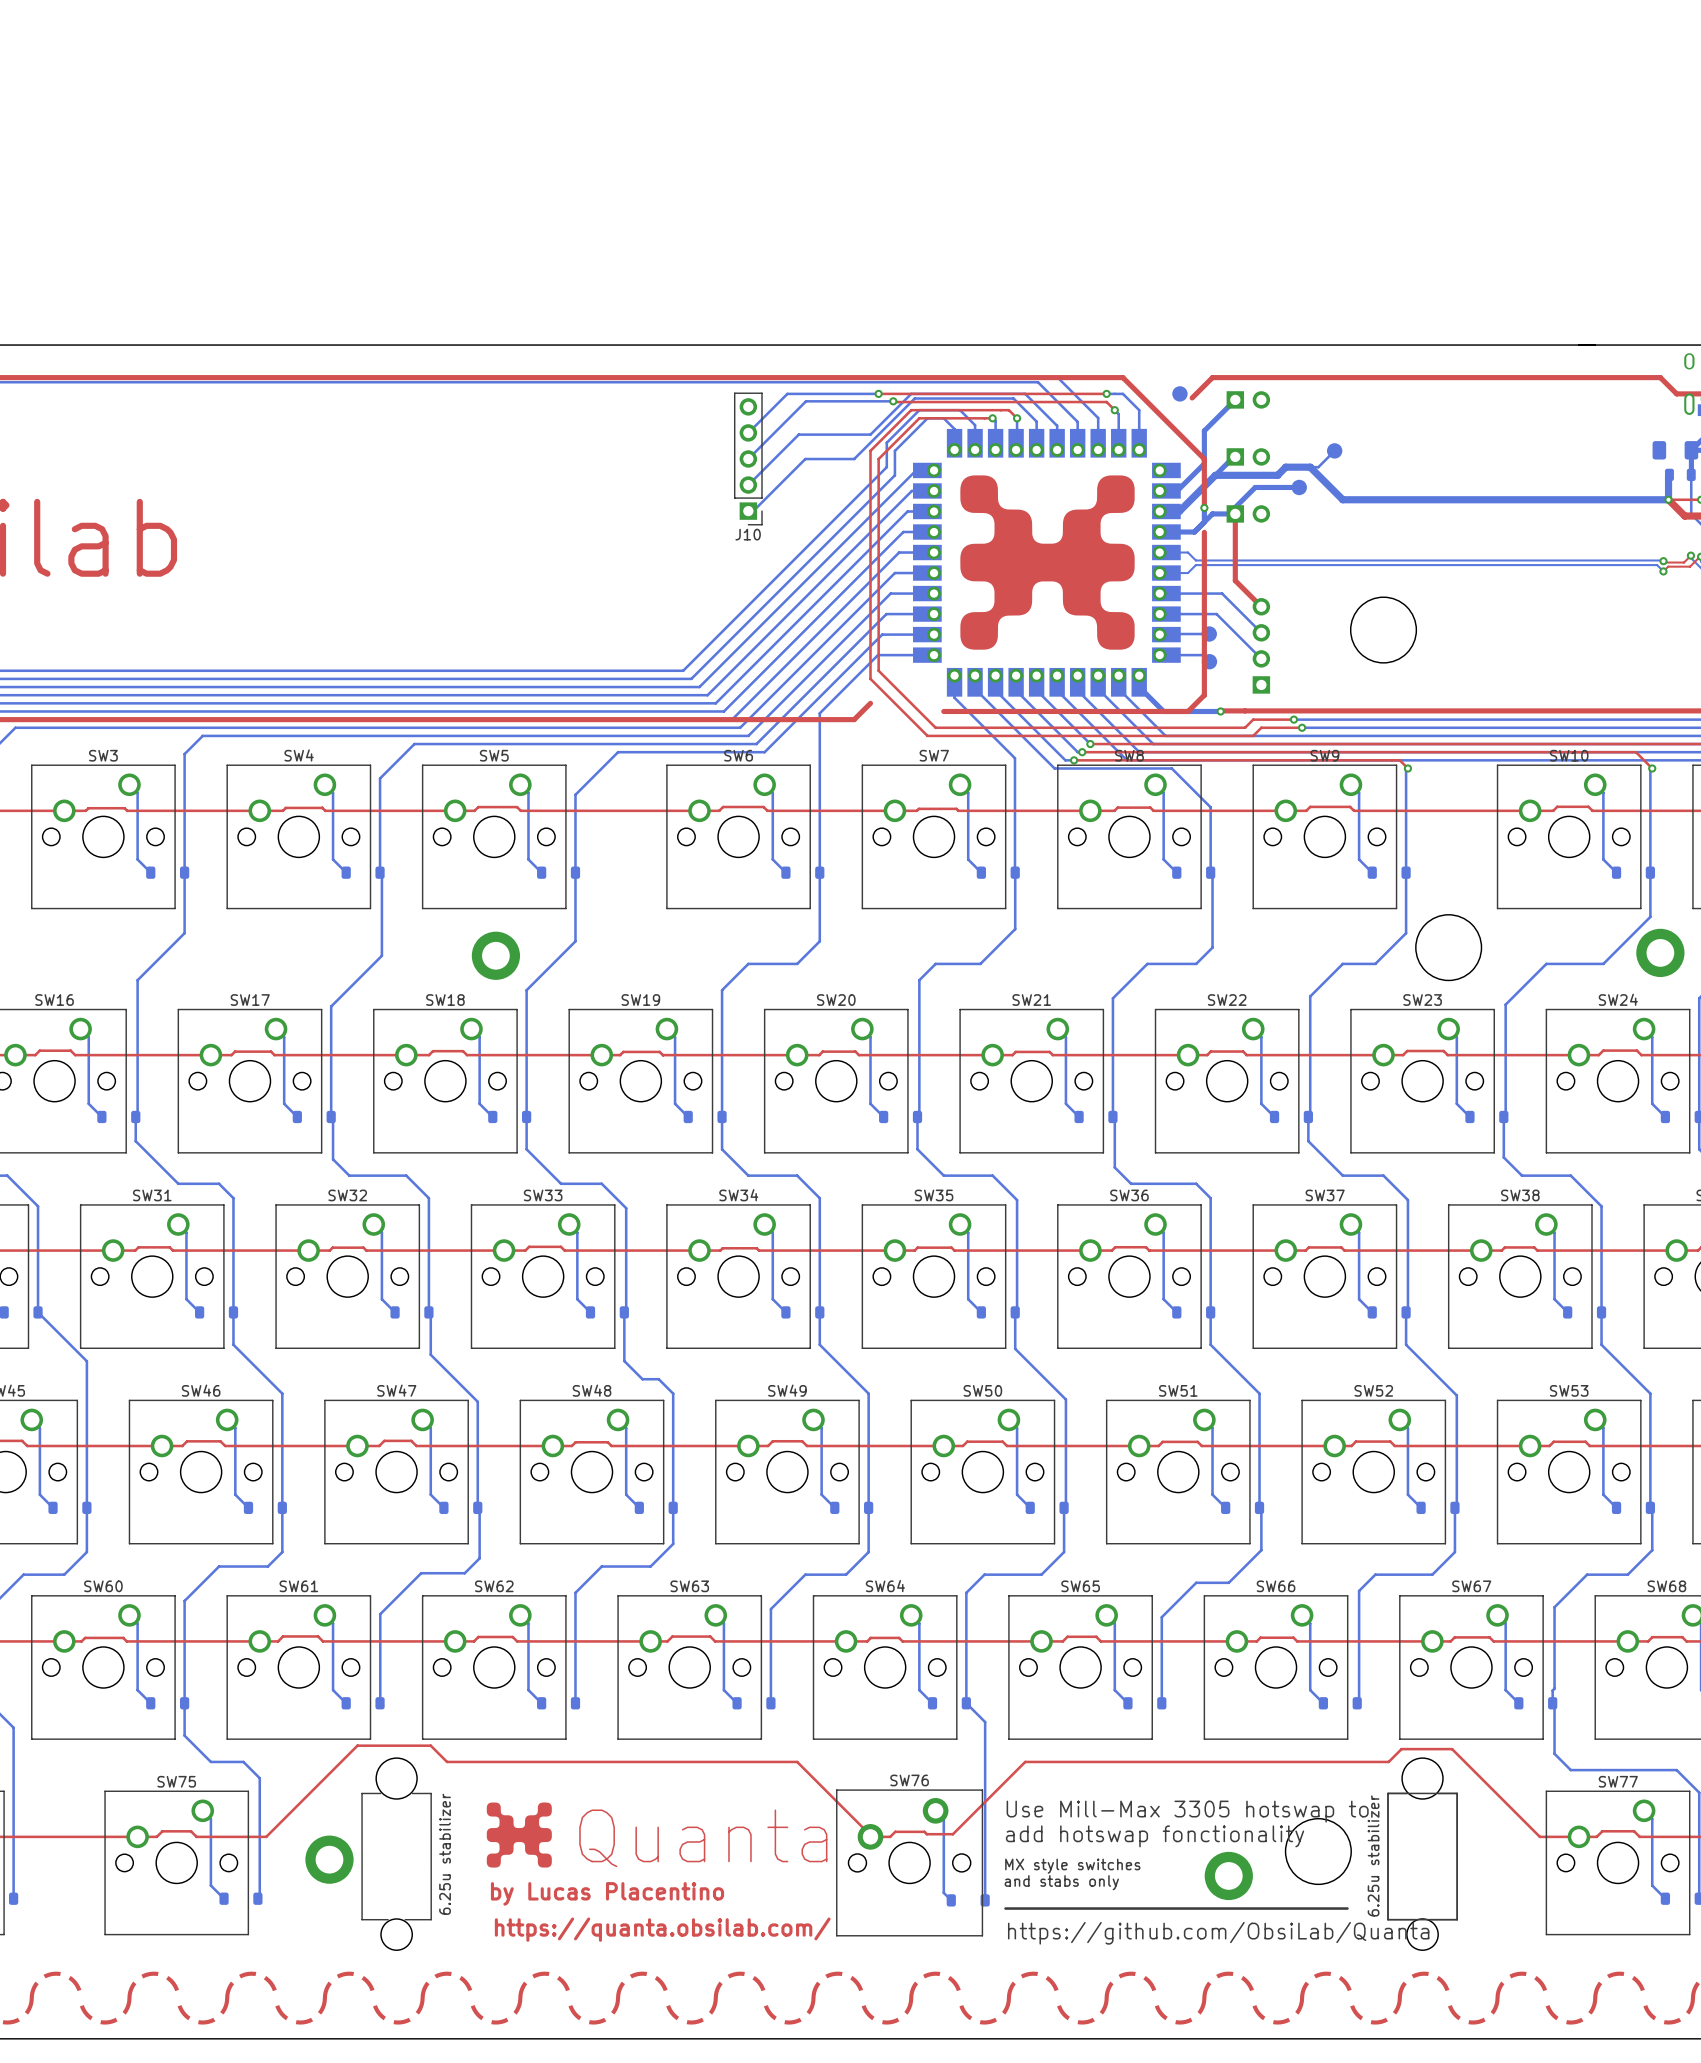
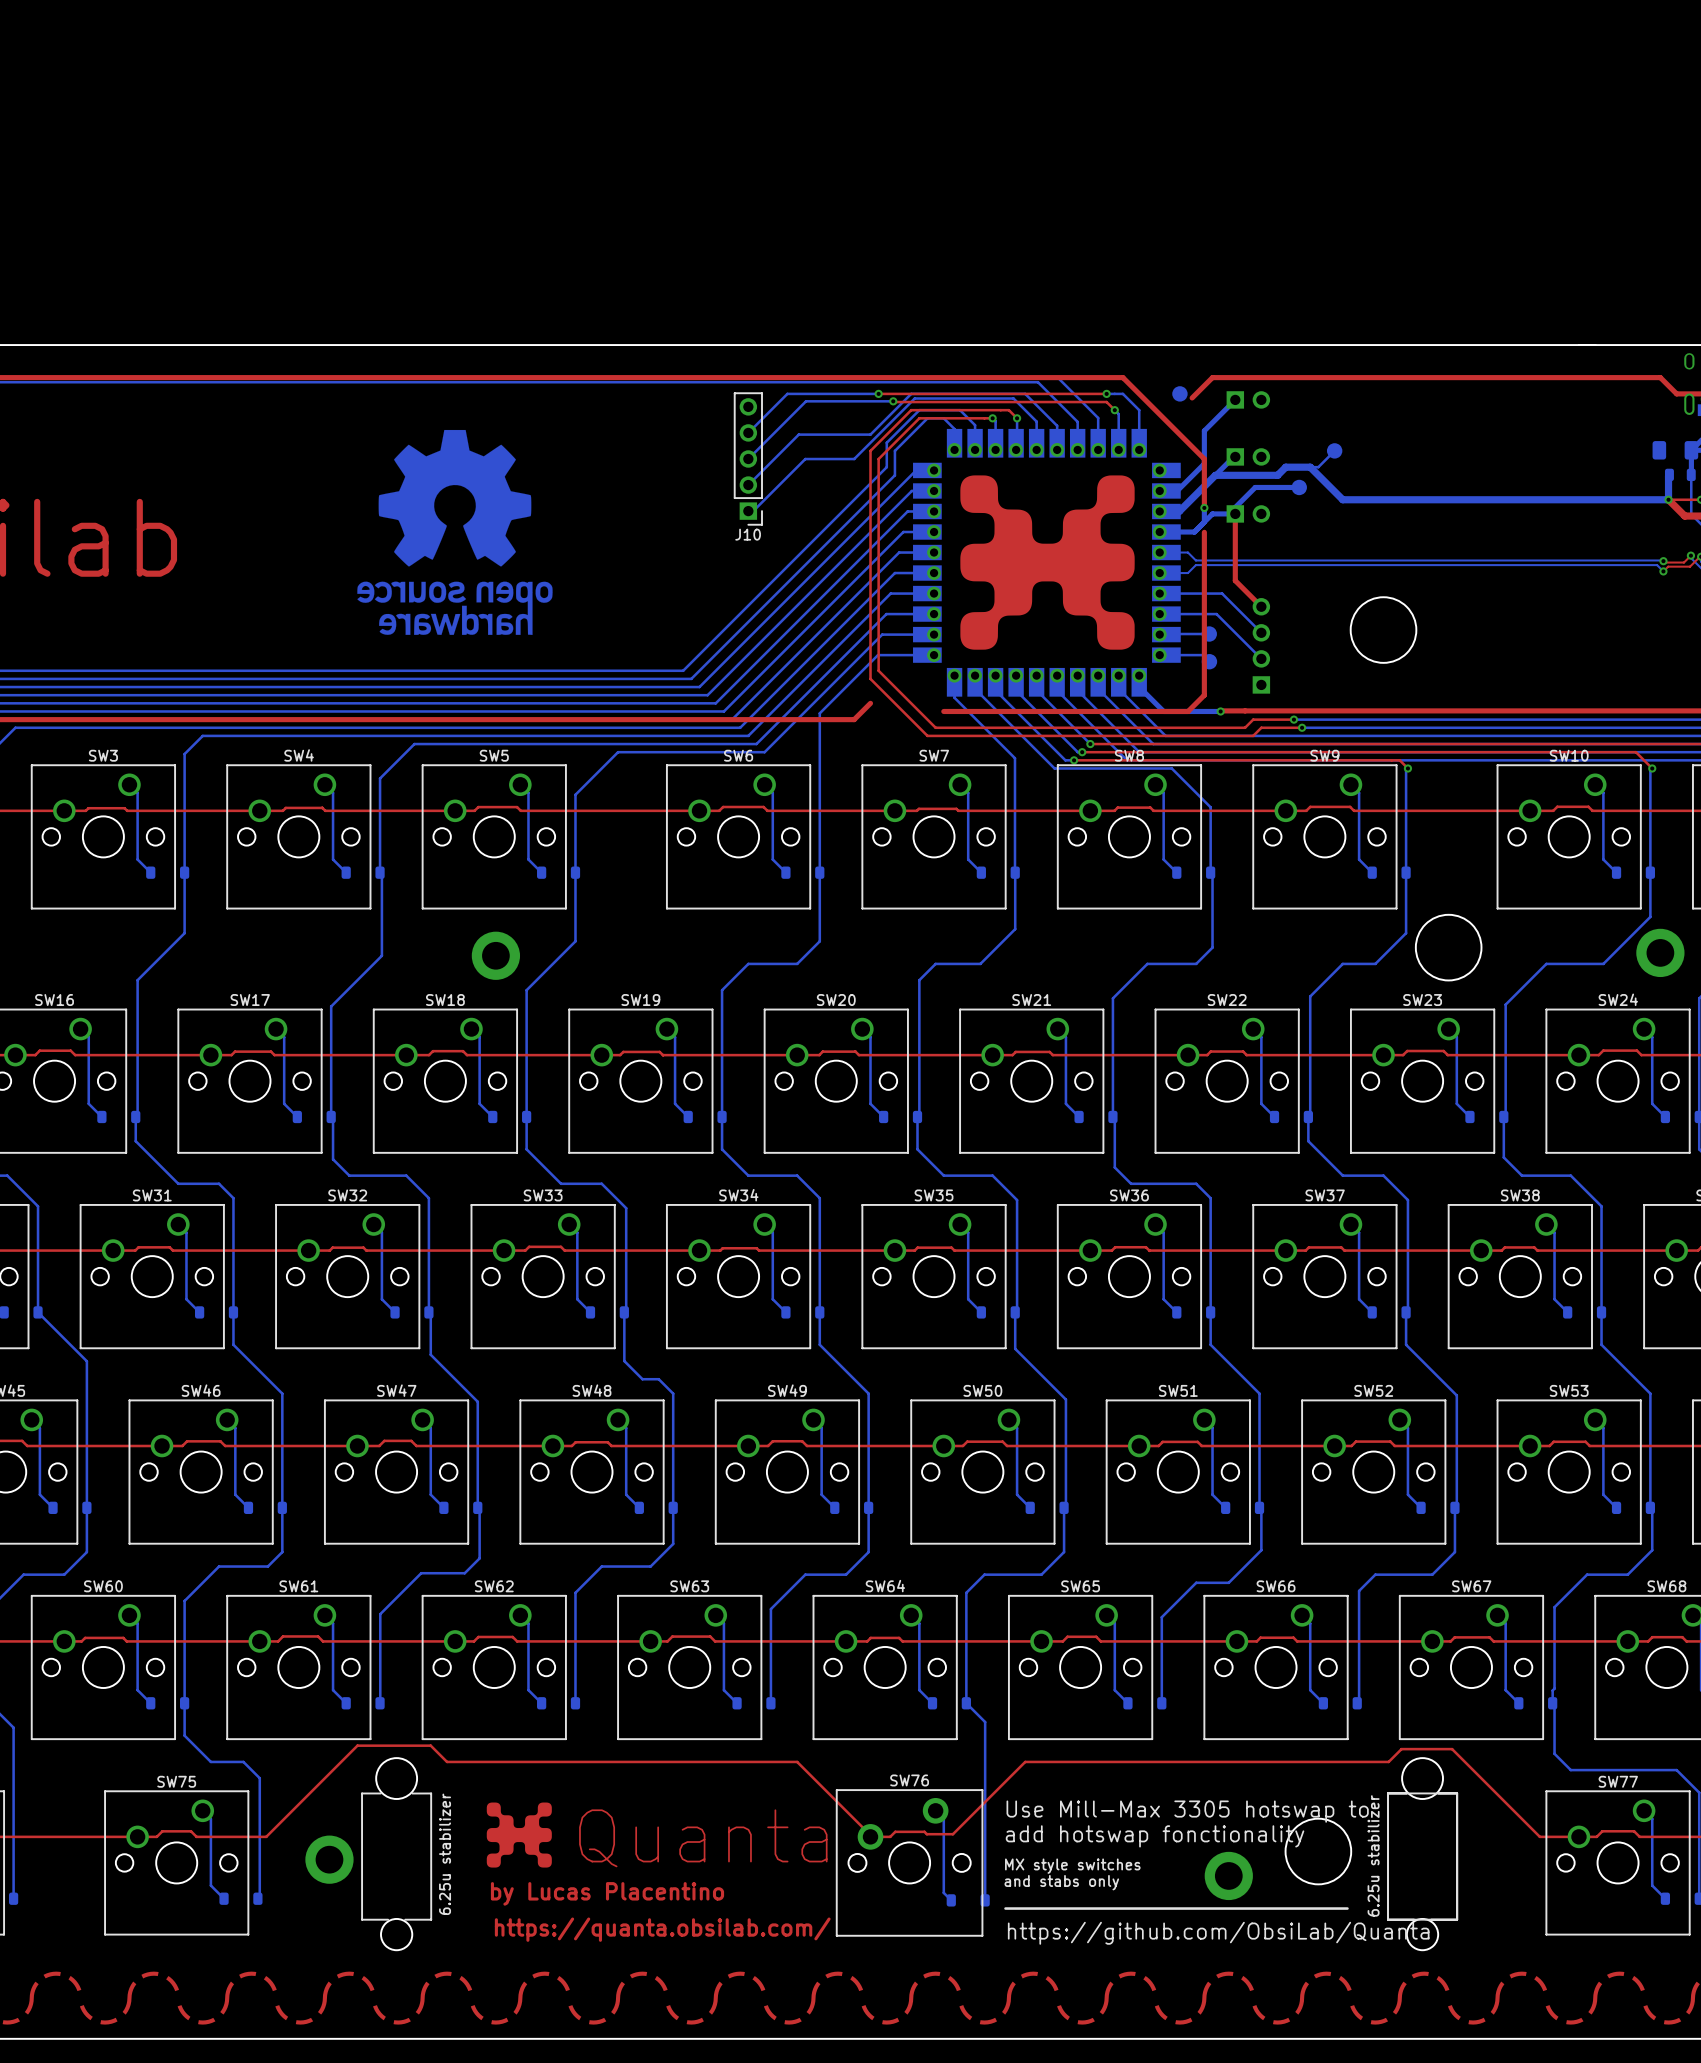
drawing: none -> [357, 429, 553, 635]

